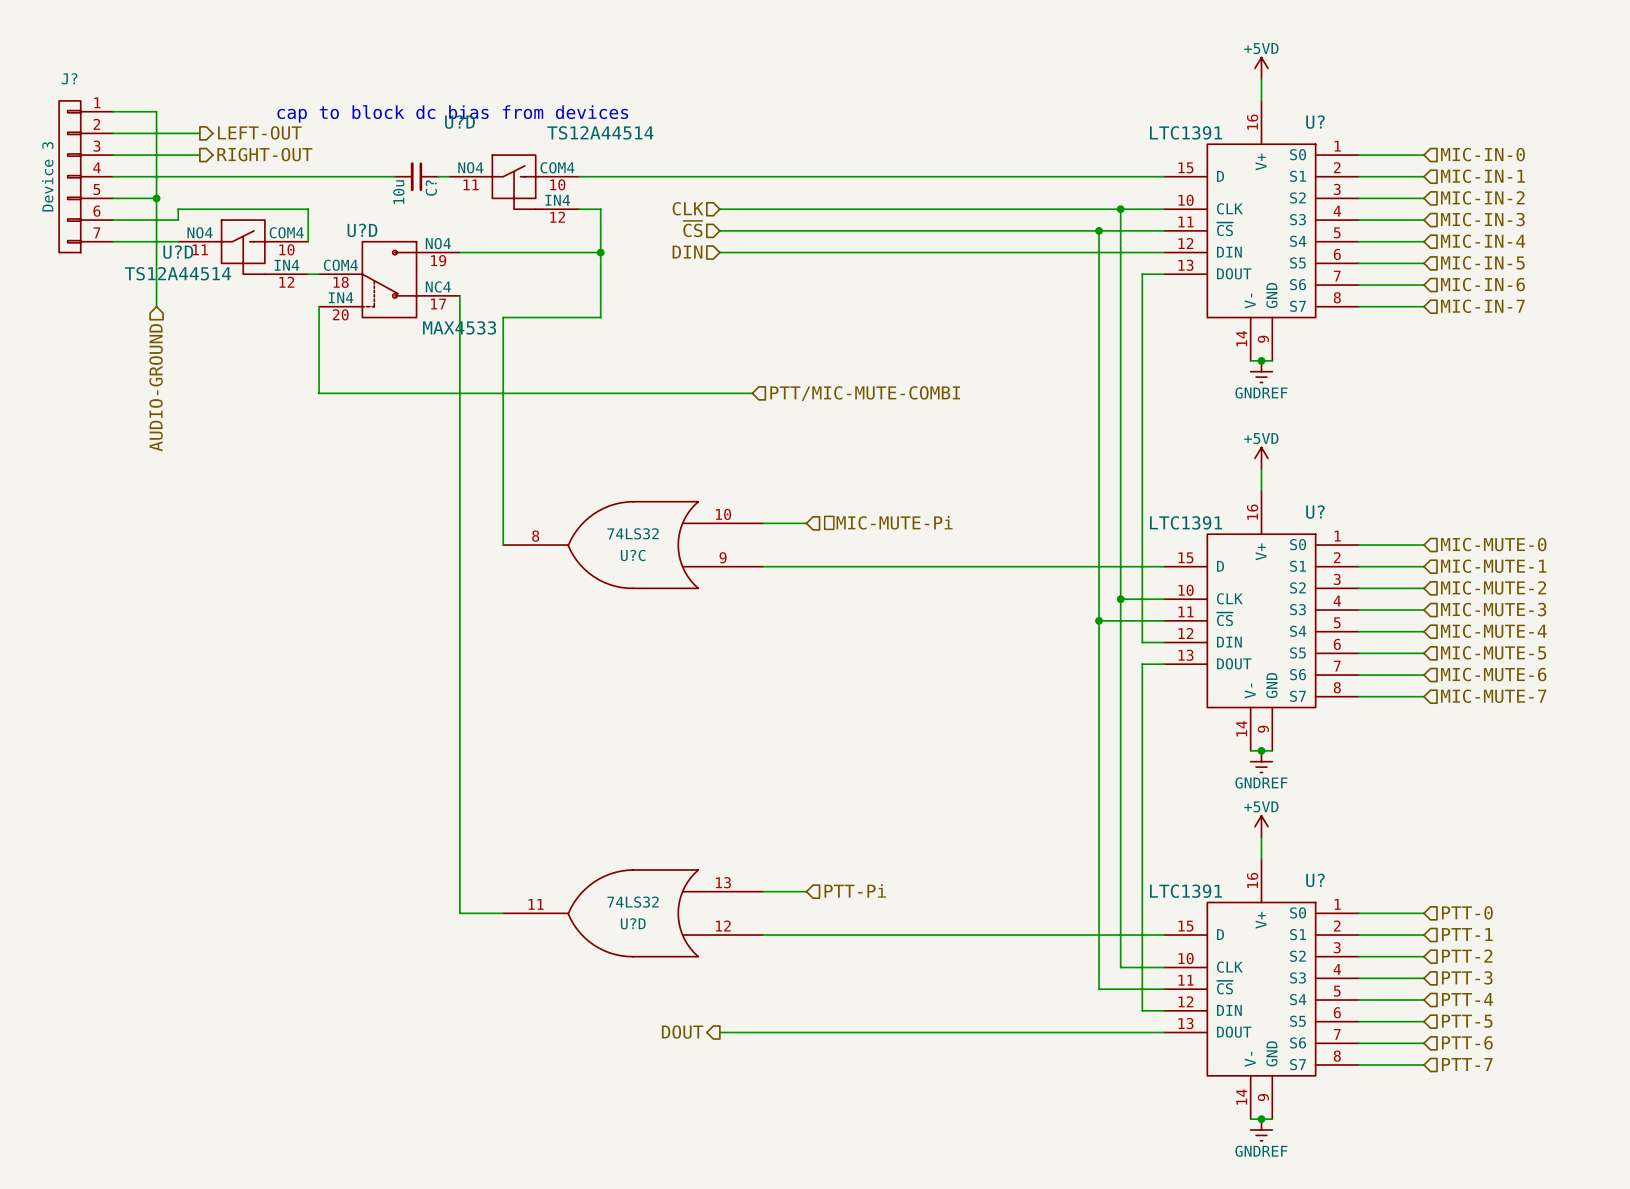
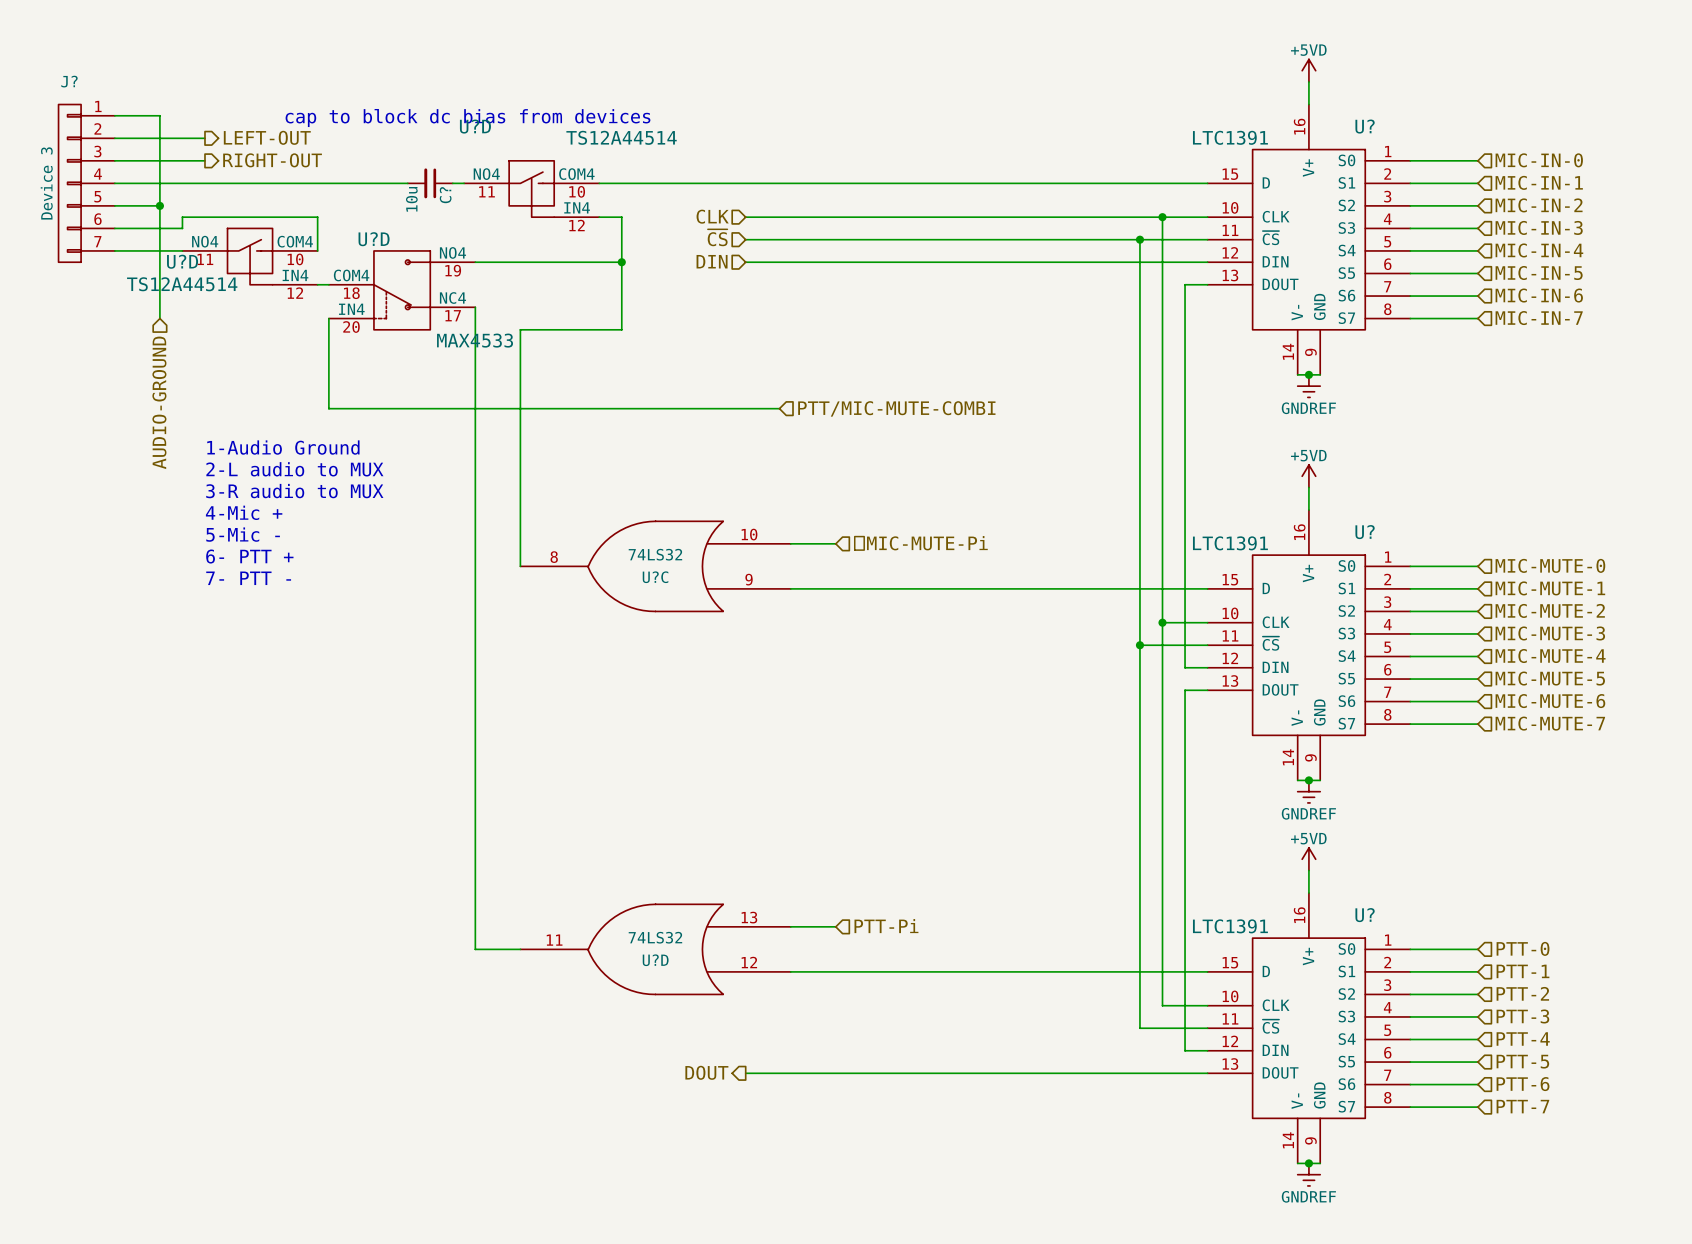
text: none -> 1-Audio Ground (283, 447)
text: none -> 2-L audio to MUX (294, 469)
text: none -> 3-R audio to MUX (294, 491)
text: none -> 4-Mic + (244, 512)
text: none -> 5-Mic - (243, 534)
text: none -> 6- PTT + (249, 556)
text: none -> 7- PTT - (248, 578)

